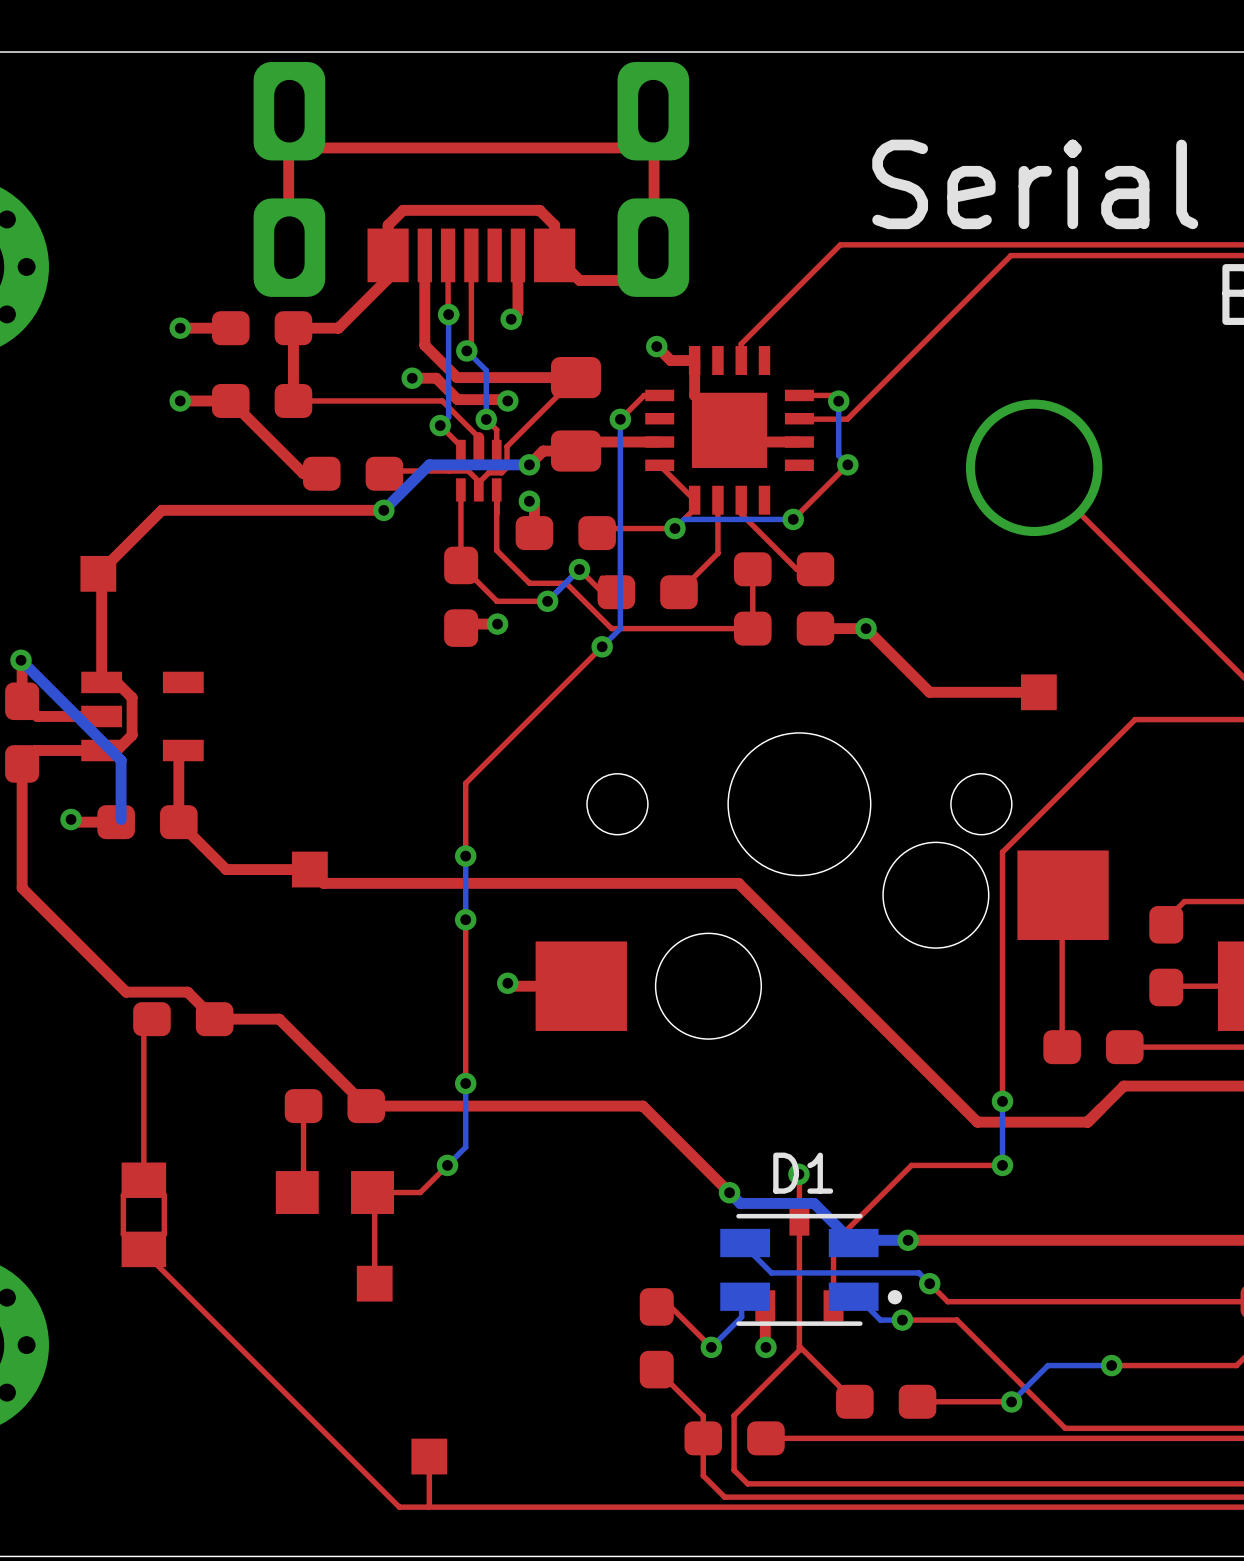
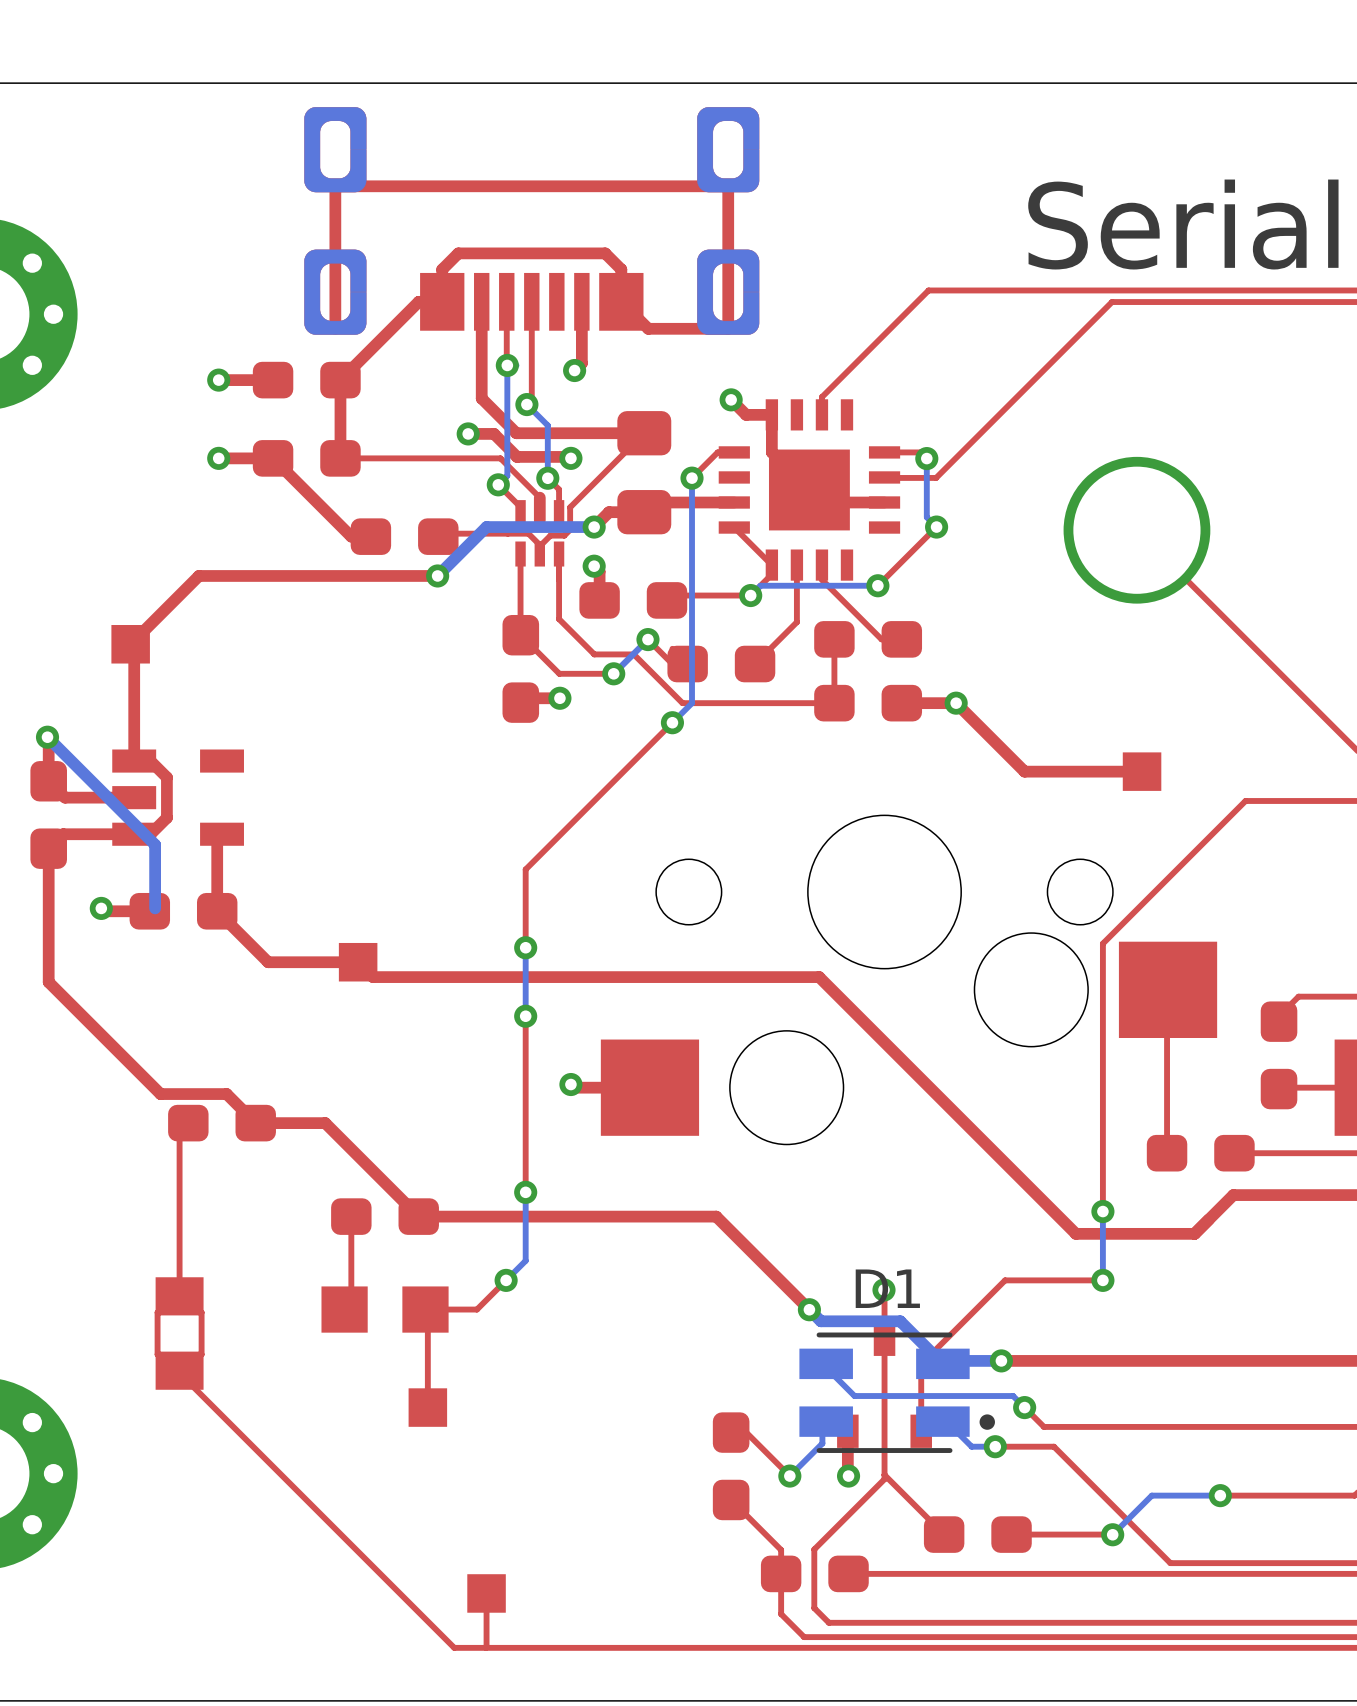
part footprint: [253, 61, 690, 297] -> [304, 107, 760, 335]
top track: (388, 255) (388, 278) (338, 328) (293, 328) -> (442, 301) (418, 301) (340, 380)

